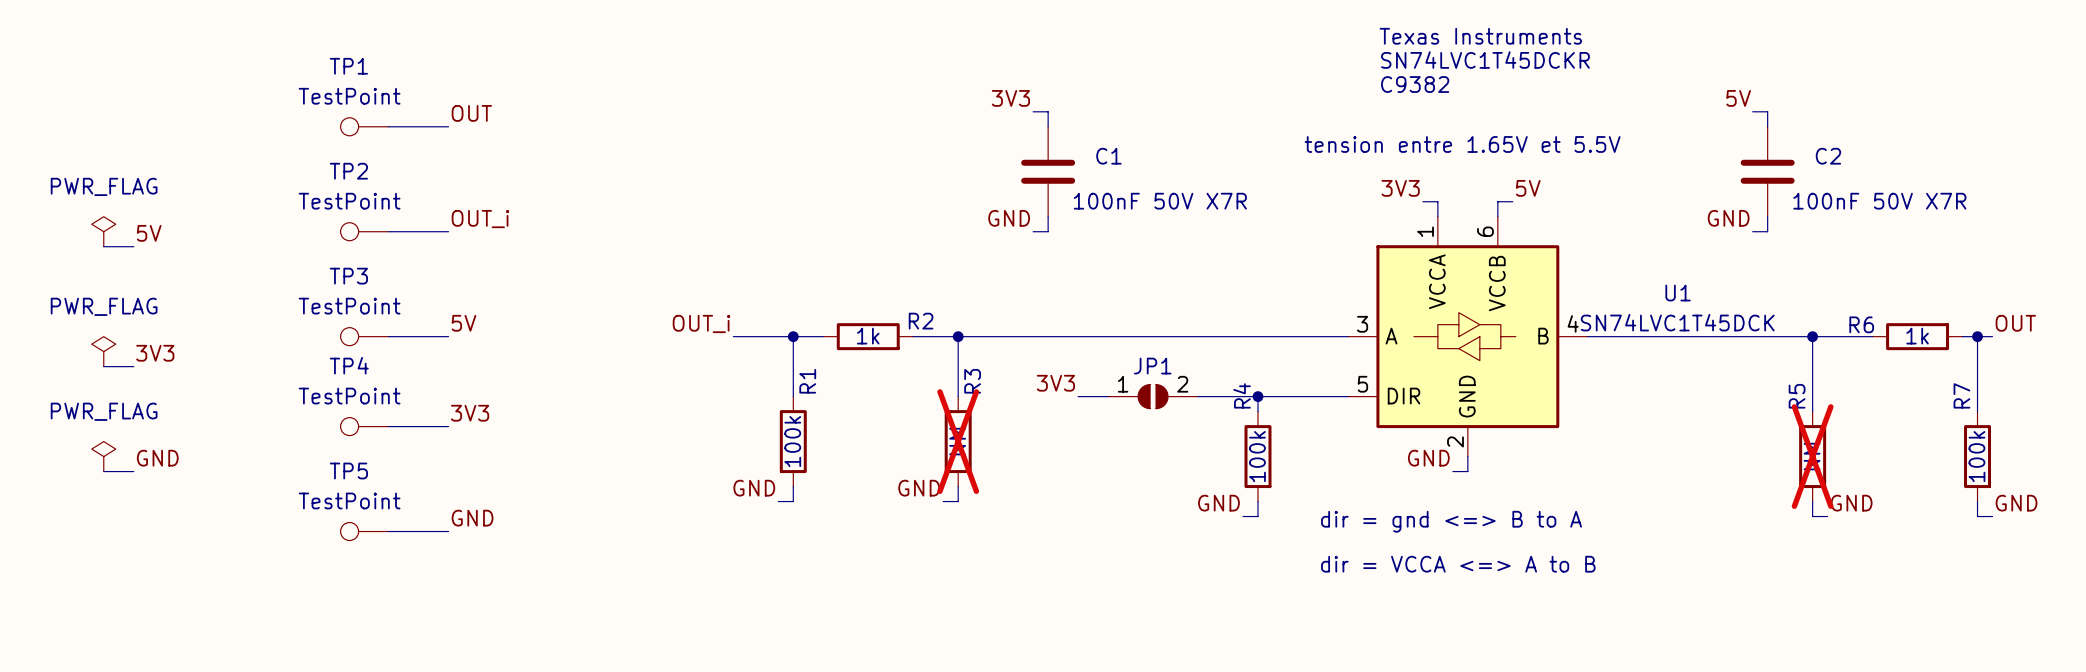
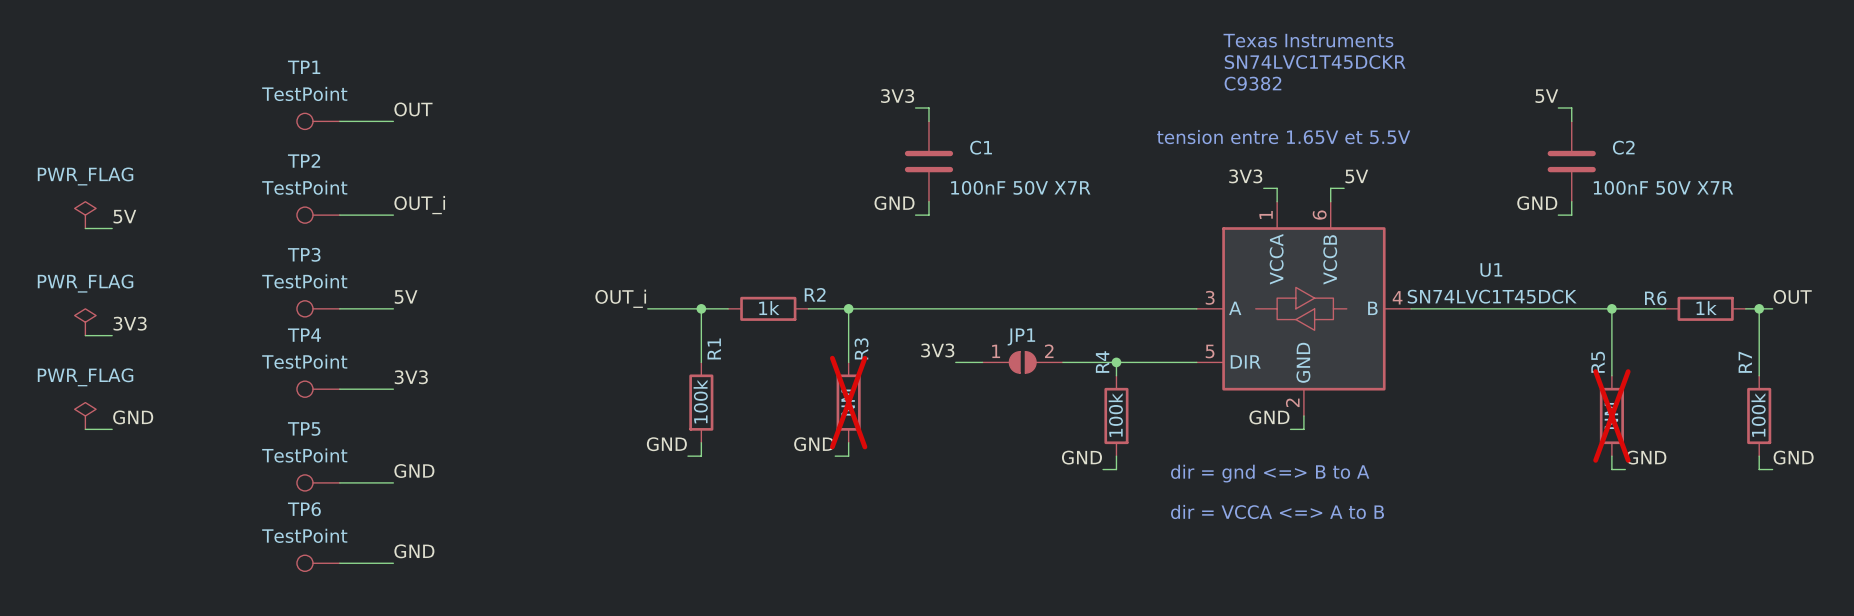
label: none -> GND (414, 551)
TP6: none -> TestPoint (318, 563)
wire: none -> (339, 563) (393, 563)

